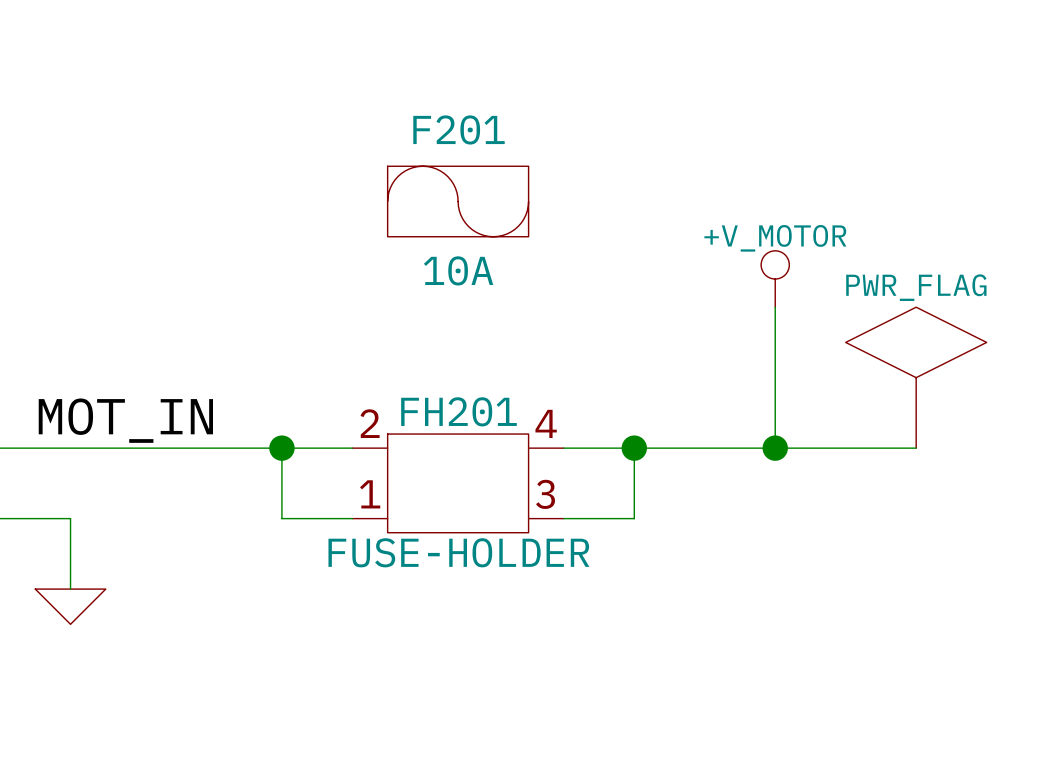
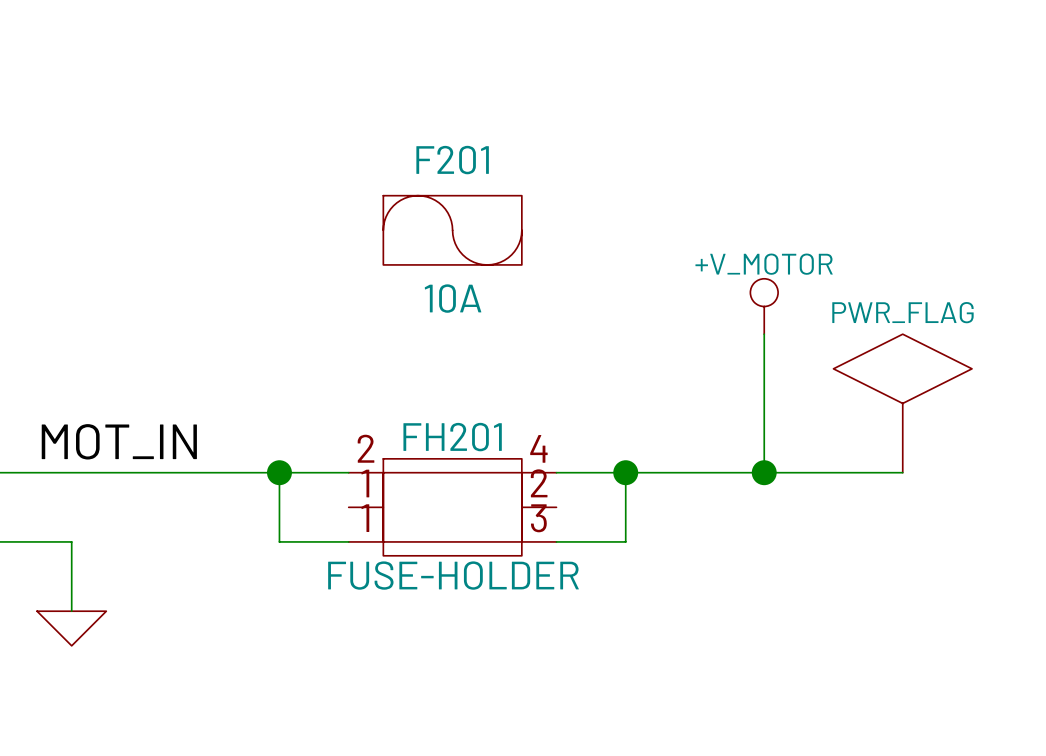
FH201 symbol: [352, 434, 564, 533] -> [348, 458, 557, 556]

